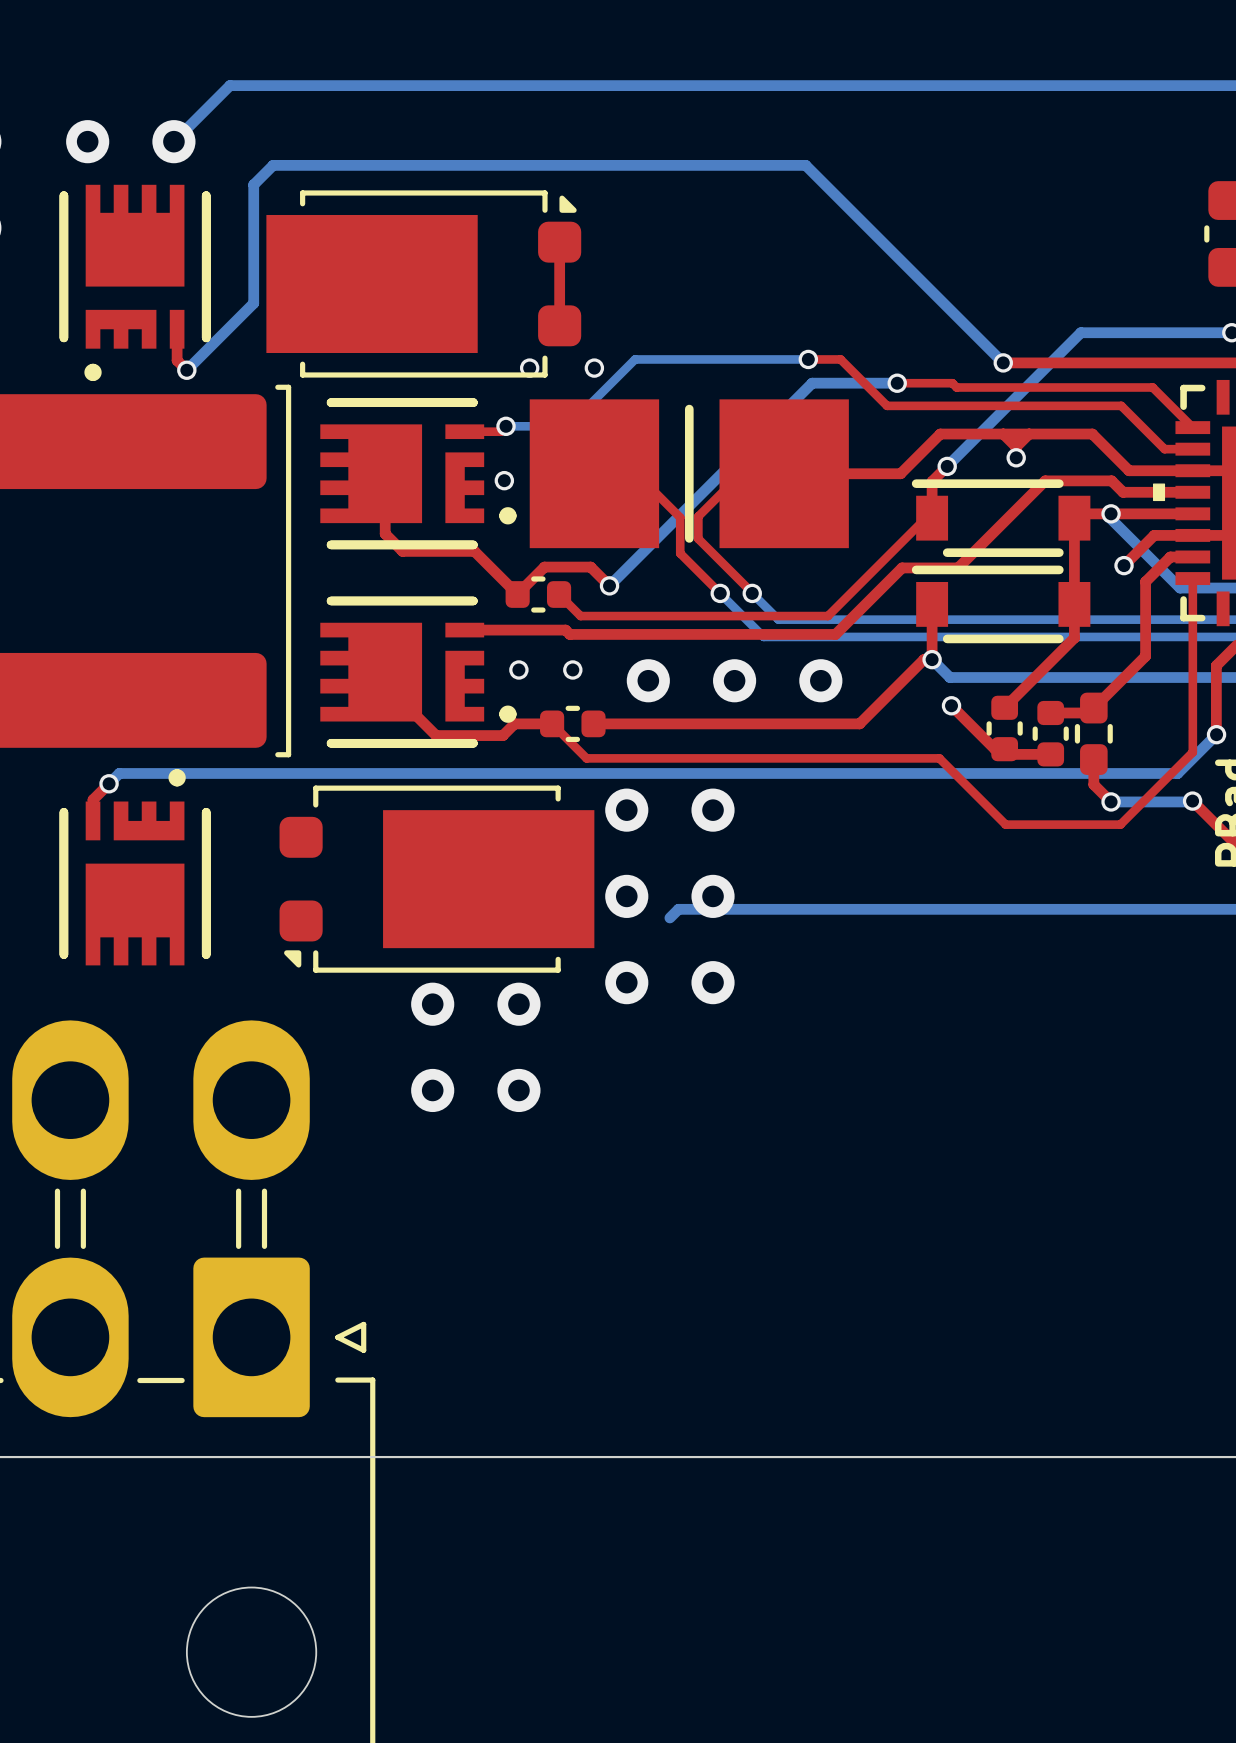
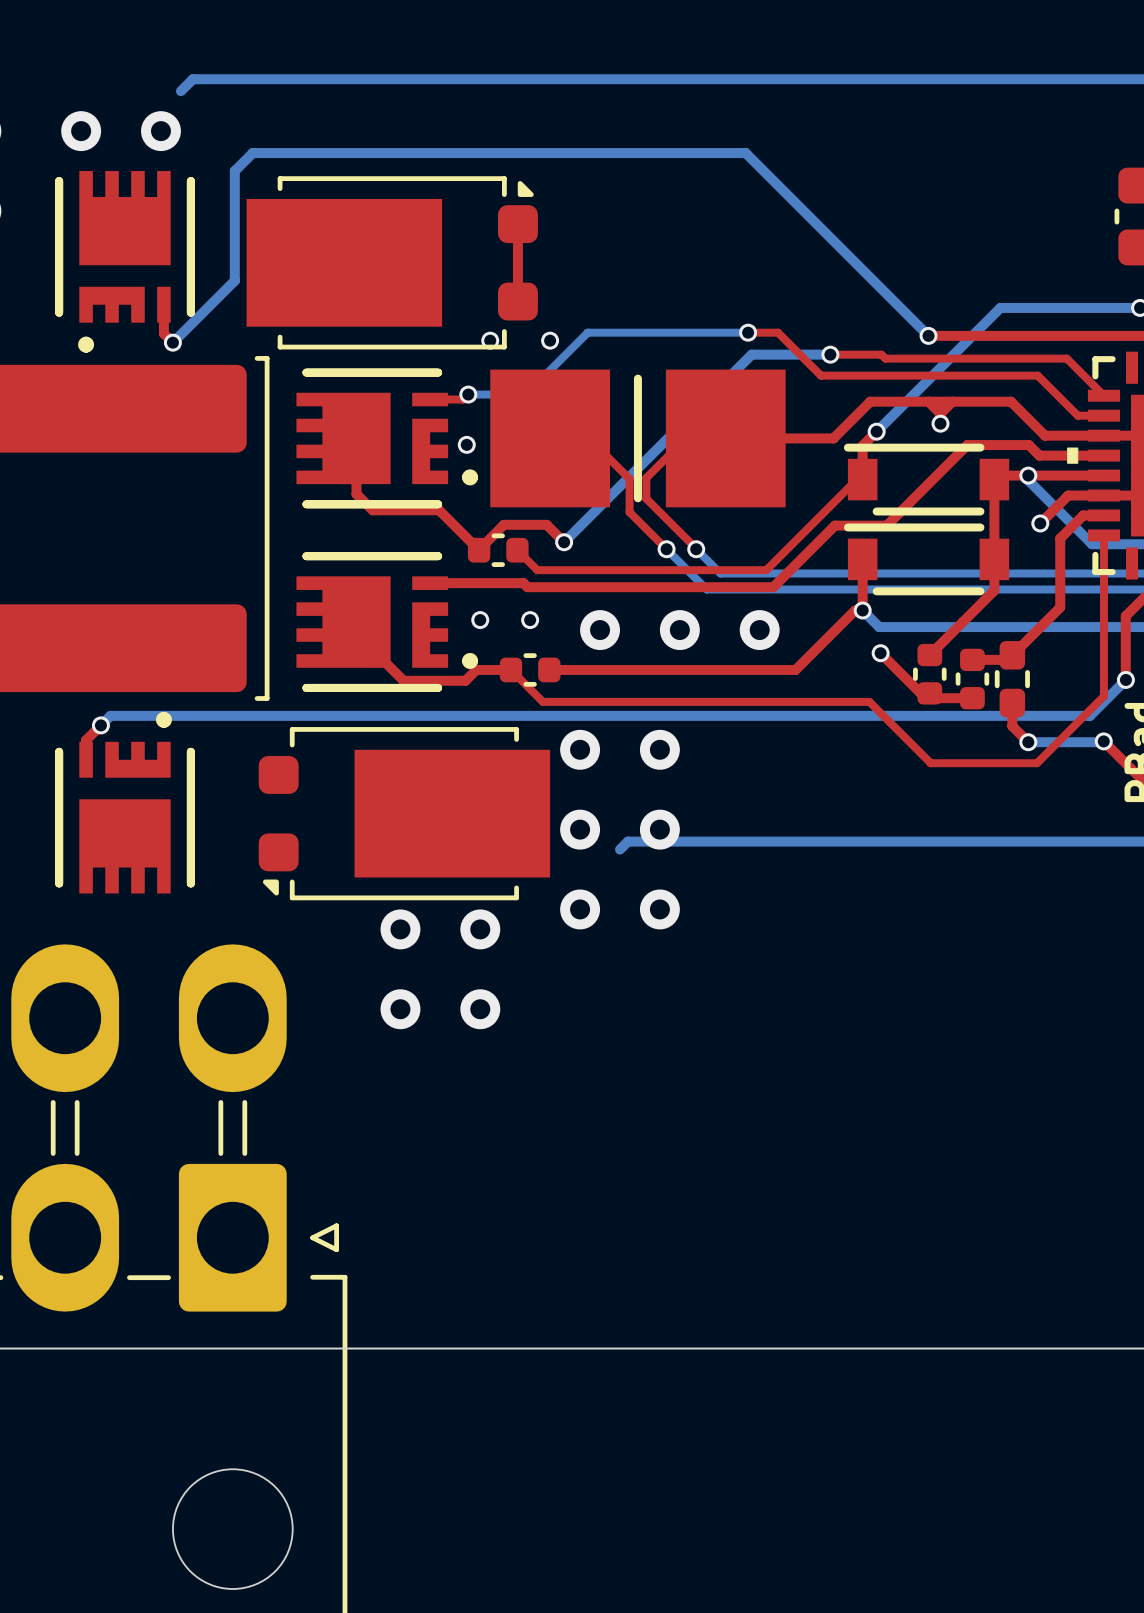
bottom track: (230, 85) (173, 141) -> (212, 79) (192, 79) (180, 91)

